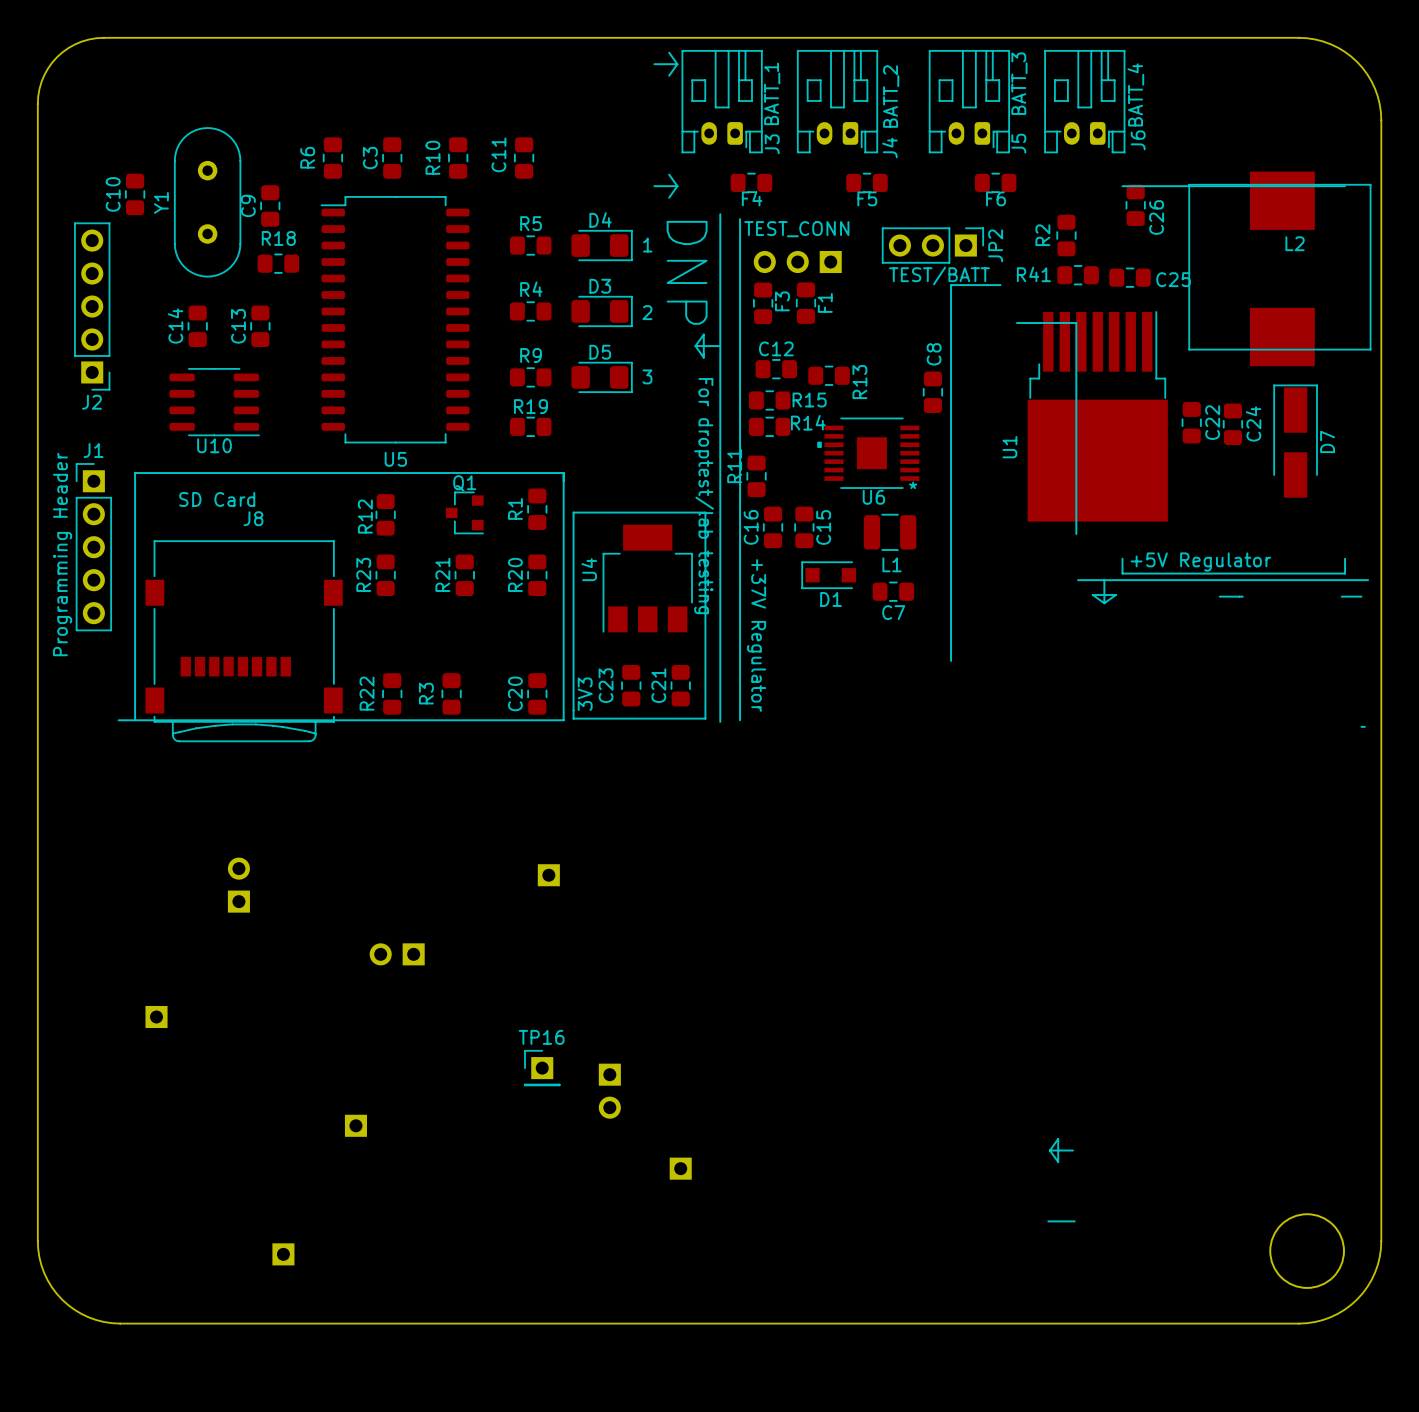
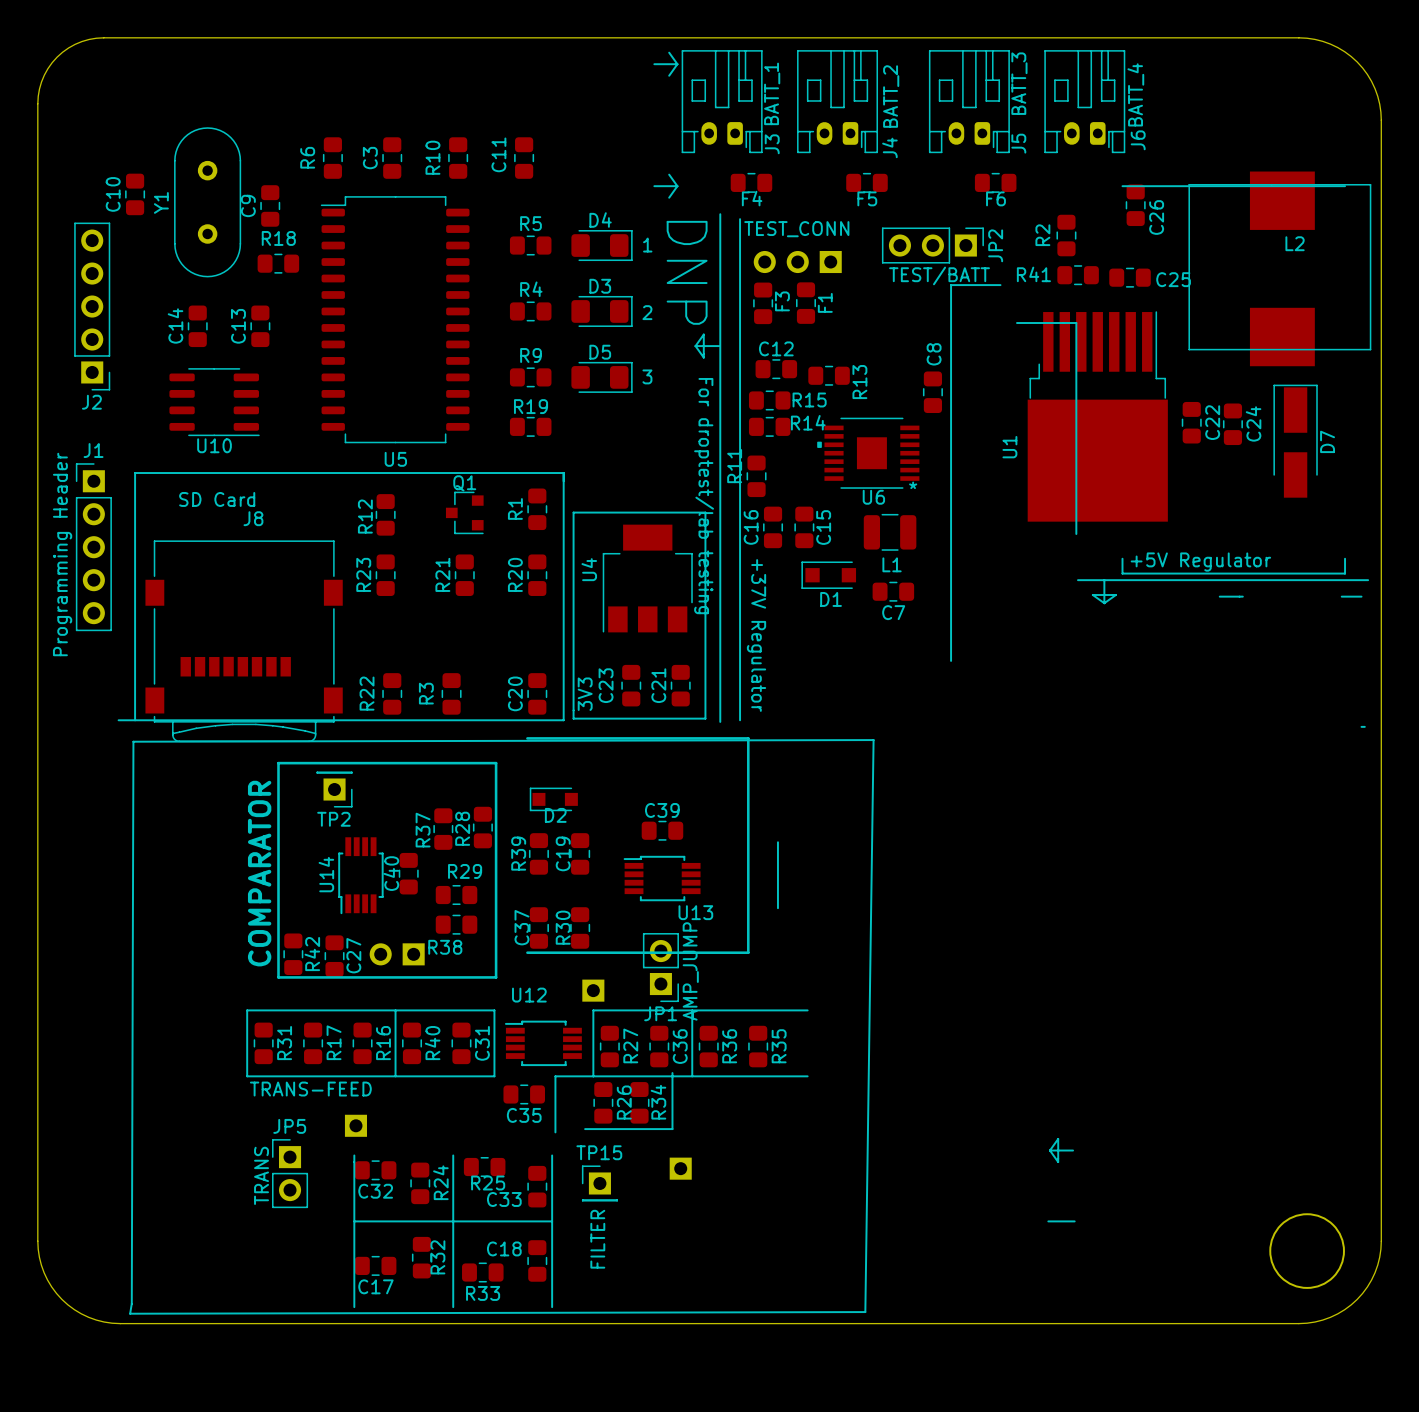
line: none -> (527, 738) (748, 738) (748, 952) (527, 952)
line: none -> (873, 740) (133, 741) (131, 1303) (130, 1313) (865, 1312) (873, 740)
line: none -> (278, 763) (496, 763) (496, 977) (278, 977) (278, 763)
TP2: none -> (334, 789)
D2: none -> (553, 799)
R28: none -> (482, 827)
R37: none -> (443, 829)
C39: none -> (662, 830)
line: none -> (777, 842) (777, 908)
R39: none -> (538, 853)
C19: none -> (580, 853)
text: none -> COMPARATOR (259, 873)
C40: none -> (408, 873)
U14: none -> (360, 875)
TP15 side: bottom (548, 875) -> top (599, 1183)
U13: none -> (662, 878)
JP5 side: bottom (238, 885) -> top (290, 1173)
R29: none -> (456, 895)
R38: none -> (456, 924)
C37: none -> (538, 927)
R30: none -> (580, 927)
R42: none -> (293, 954)
C27: none -> (334, 956)
line: none -> (247, 1010) (494, 1010) (494, 1076) (247, 1076) (247, 1010)
line: none -> (395, 1010) (395, 1076)
line: none -> (692, 1010) (692, 1076)
line: none -> (807, 1010) (593, 1010) (593, 1076)
part: (156, 1016) -> none
R31: none -> (263, 1043)
R17: none -> (313, 1043)
R16: none -> (362, 1043)
R40: none -> (412, 1043)
C31: none -> (461, 1043)
U12: none -> (543, 1043)
R27: none -> (609, 1046)
C36: none -> (659, 1046)
R36: none -> (708, 1046)
R35: none -> (758, 1046)
TP16 side: top (542, 1068) -> bottom (593, 990)
line: none -> (672, 1073) (672, 1129) (585, 1129)
line: none -> (807, 1076) (555, 1076) (555, 1132)
text: none -> TRANS-FEED (310, 1089)
JP1 side: bottom (609, 1091) -> top (660, 967)
C35: none -> (524, 1094)
R26: none -> (603, 1102)
R34: none -> (639, 1102)
line: none -> (354, 1155) (354, 1307)
line: none -> (453, 1155) (453, 1307)
line: none -> (552, 1155) (552, 1307)
R25: none -> (484, 1167)
C32: none -> (375, 1170)
R24: none -> (420, 1183)
C33: none -> (537, 1186)
line: none -> (354, 1221) (552, 1221)
part: (283, 1254) -> none
R32: none -> (421, 1257)
C18: none -> (537, 1260)
C17: none -> (375, 1265)
R33: none -> (482, 1272)

